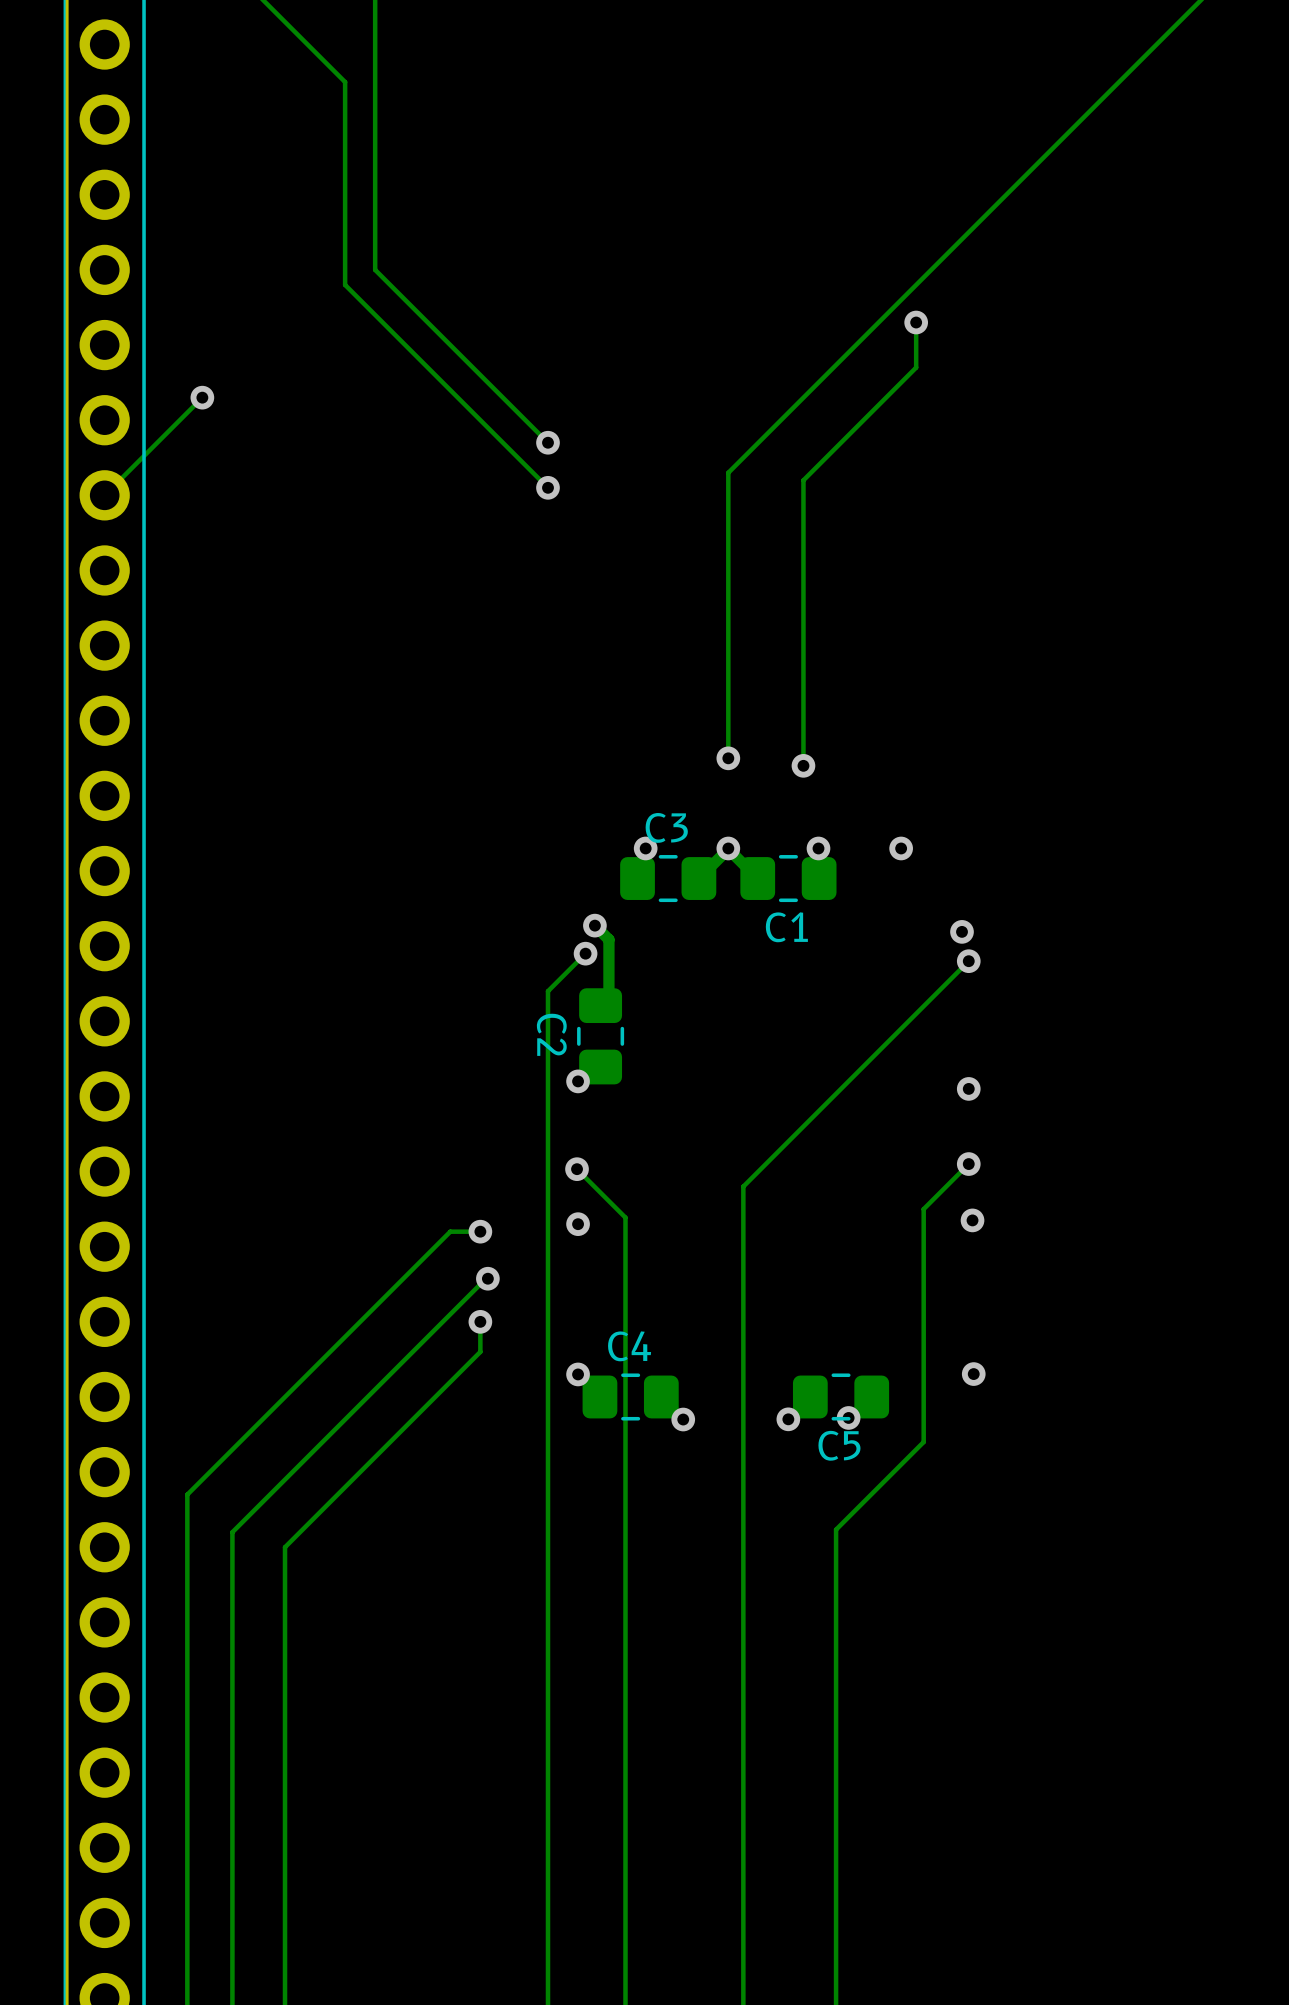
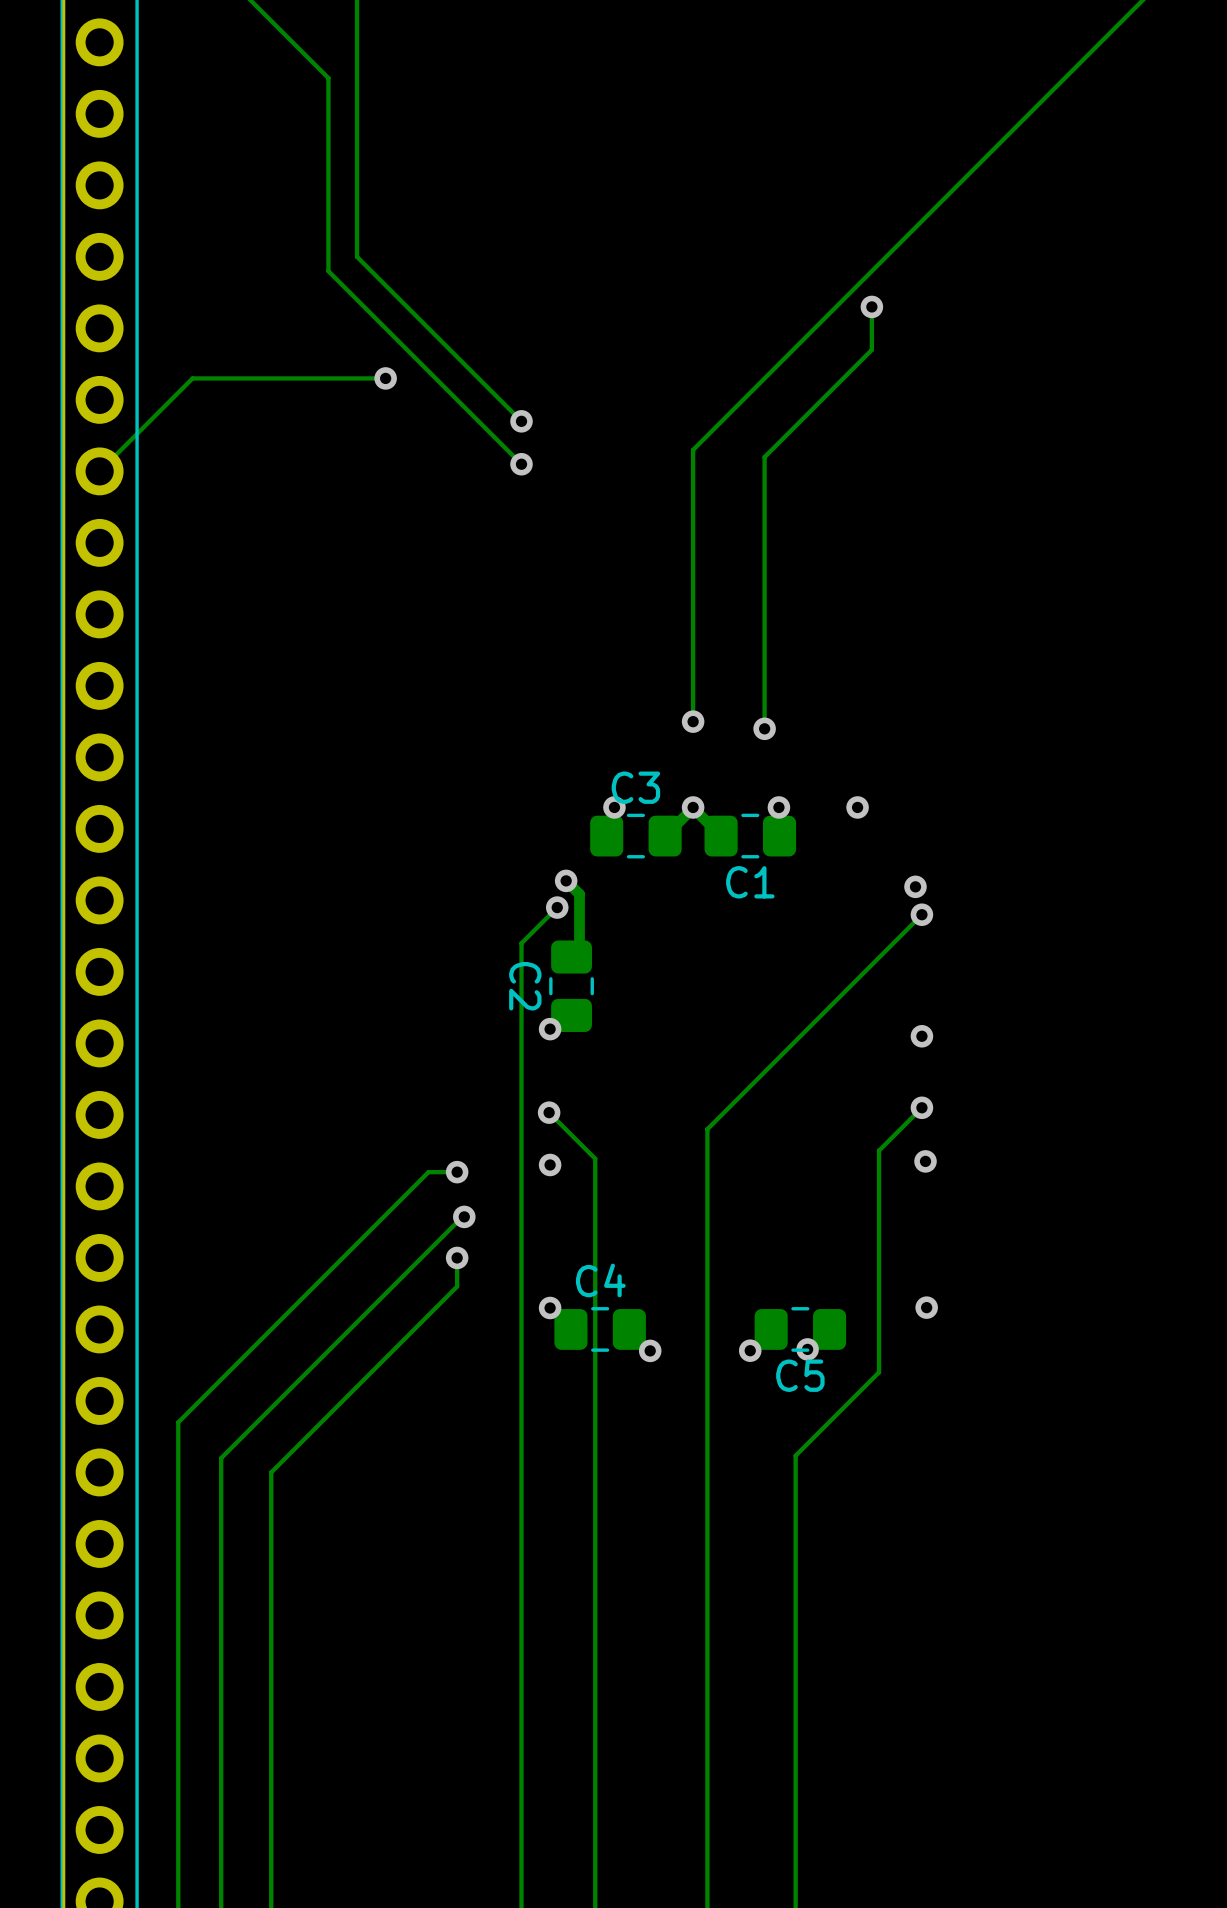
via: (202, 397) -> none
track: none -> (385, 378) (192, 378)
via: none -> (385, 378)

